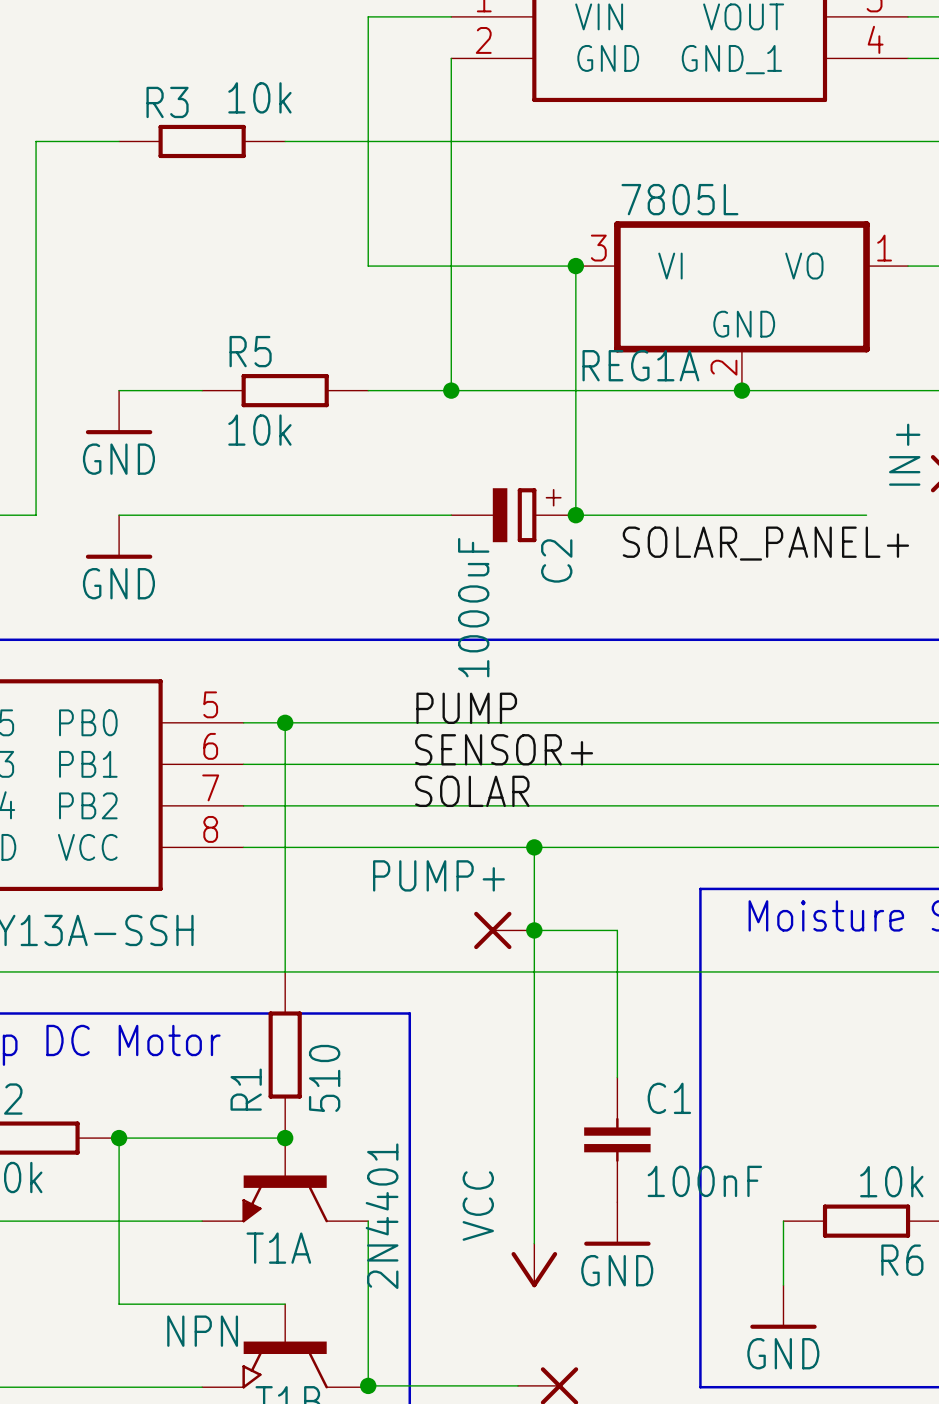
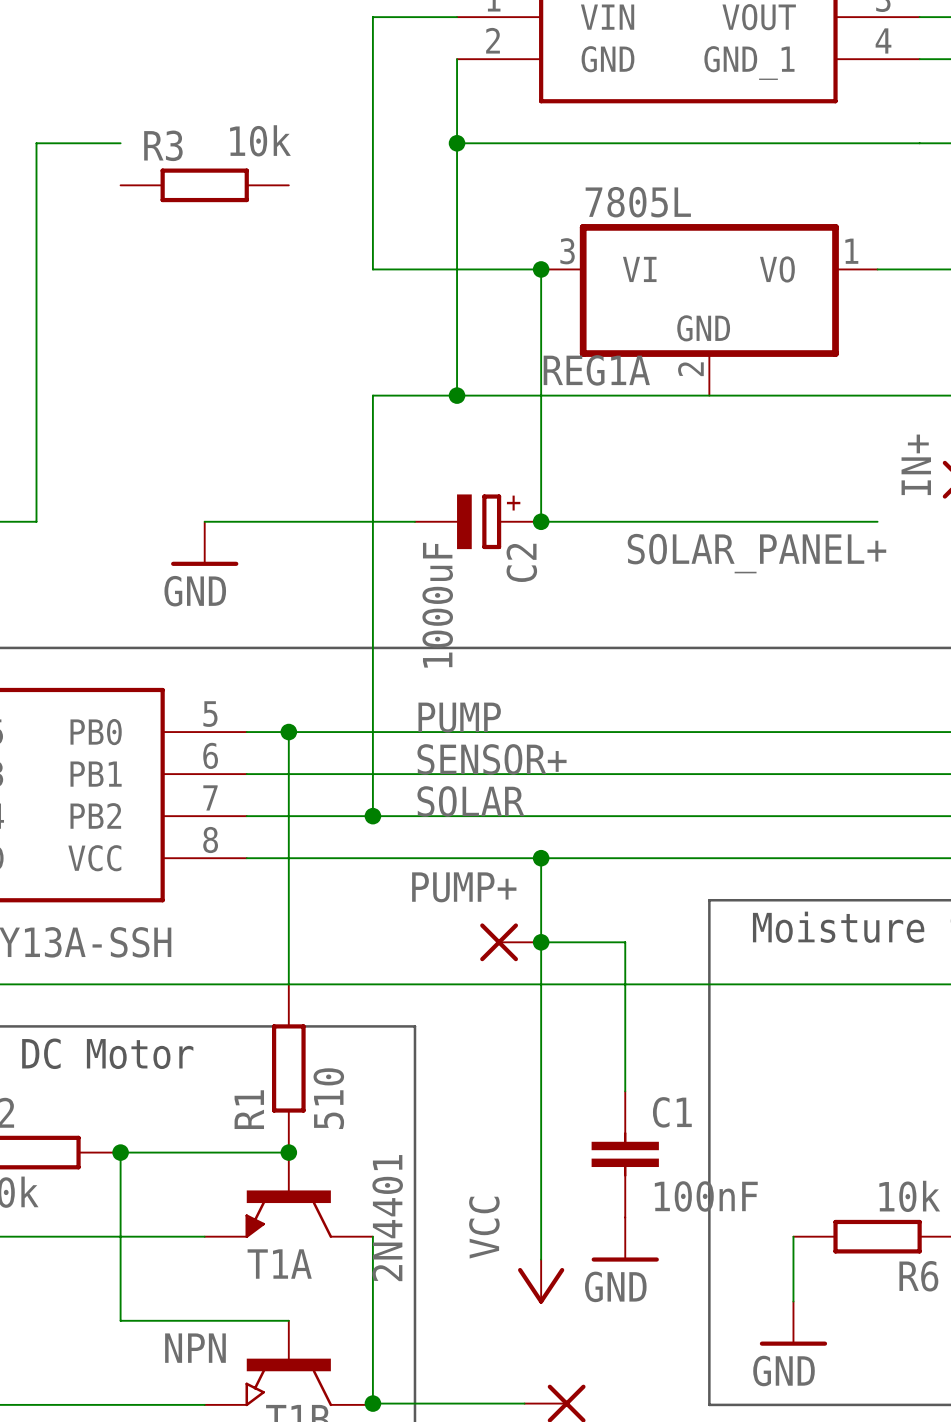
R3 position: (202, 141) -> (204, 185)
wire: (285, 141) (451, 141) -> none
junction: none -> (457, 143)
wire: (534, 266) (575, 266) (575, 515) -> (541, 269) (541, 521) (583, 521)
junction position: (575, 266) -> (541, 269)
REG1A position: (741, 305) -> (709, 309)
wire: (119, 390) (202, 390) -> none
R5: 10k (285, 390) -> none
wire: none -> (372, 395) (372, 816)
junction: (741, 390) -> none
power symbol: GND (119, 412) -> none
wire: (119, 515) (202, 515) -> none
C2 position: (513, 515) -> (478, 521)
junction position: (575, 515) -> (541, 521)
power symbol: GND (119, 537) -> none
power symbol: none -> GND (204, 543)
junction: none -> (372, 816)

